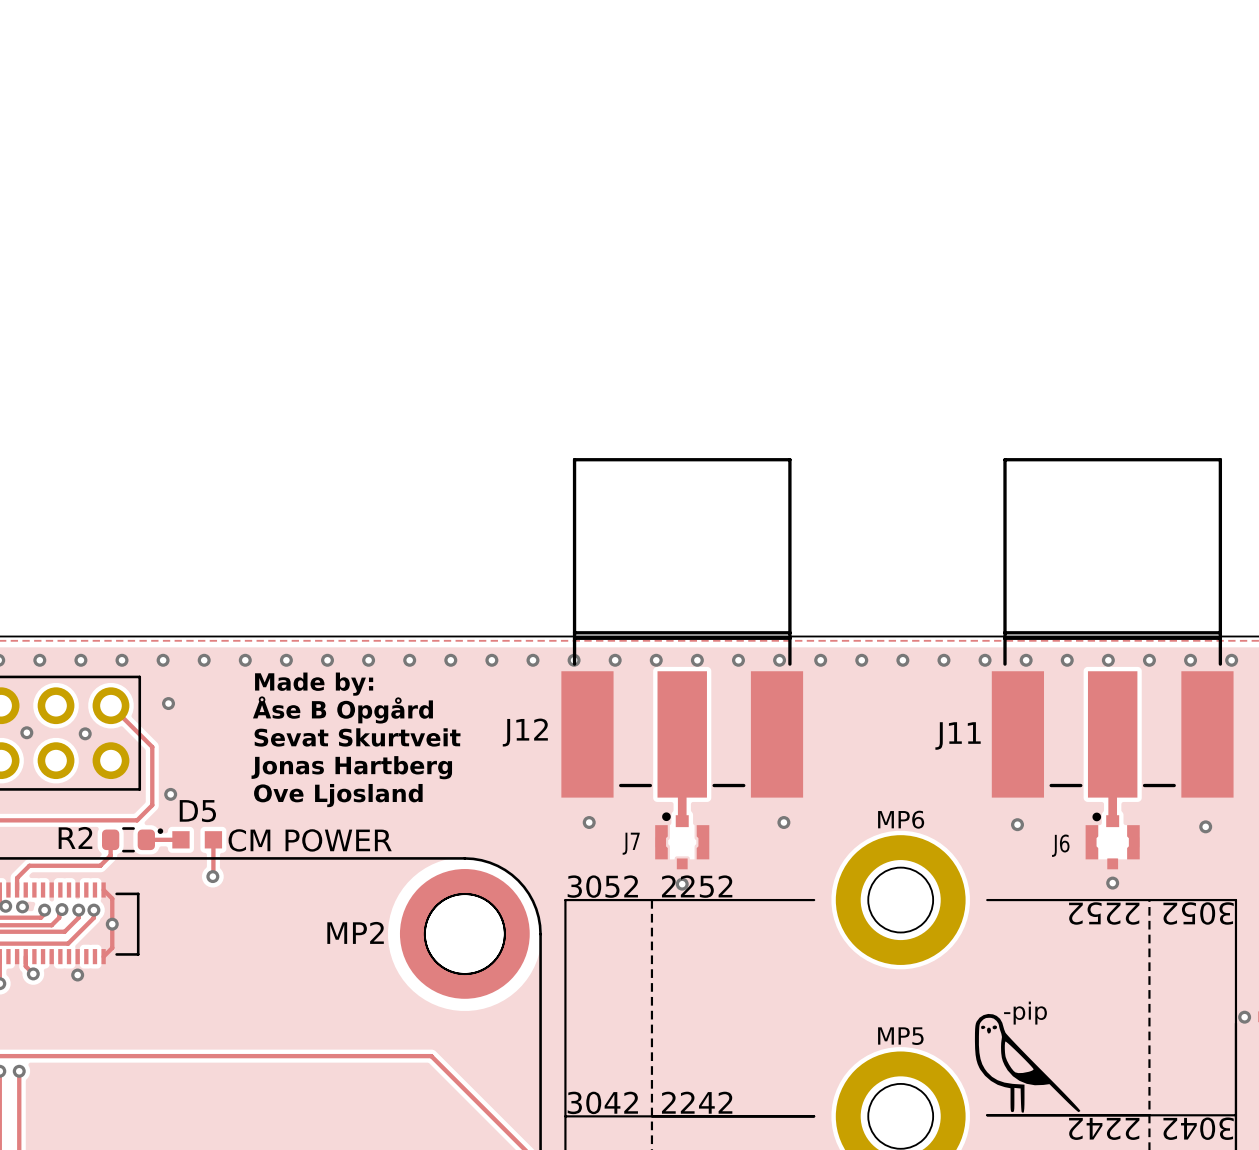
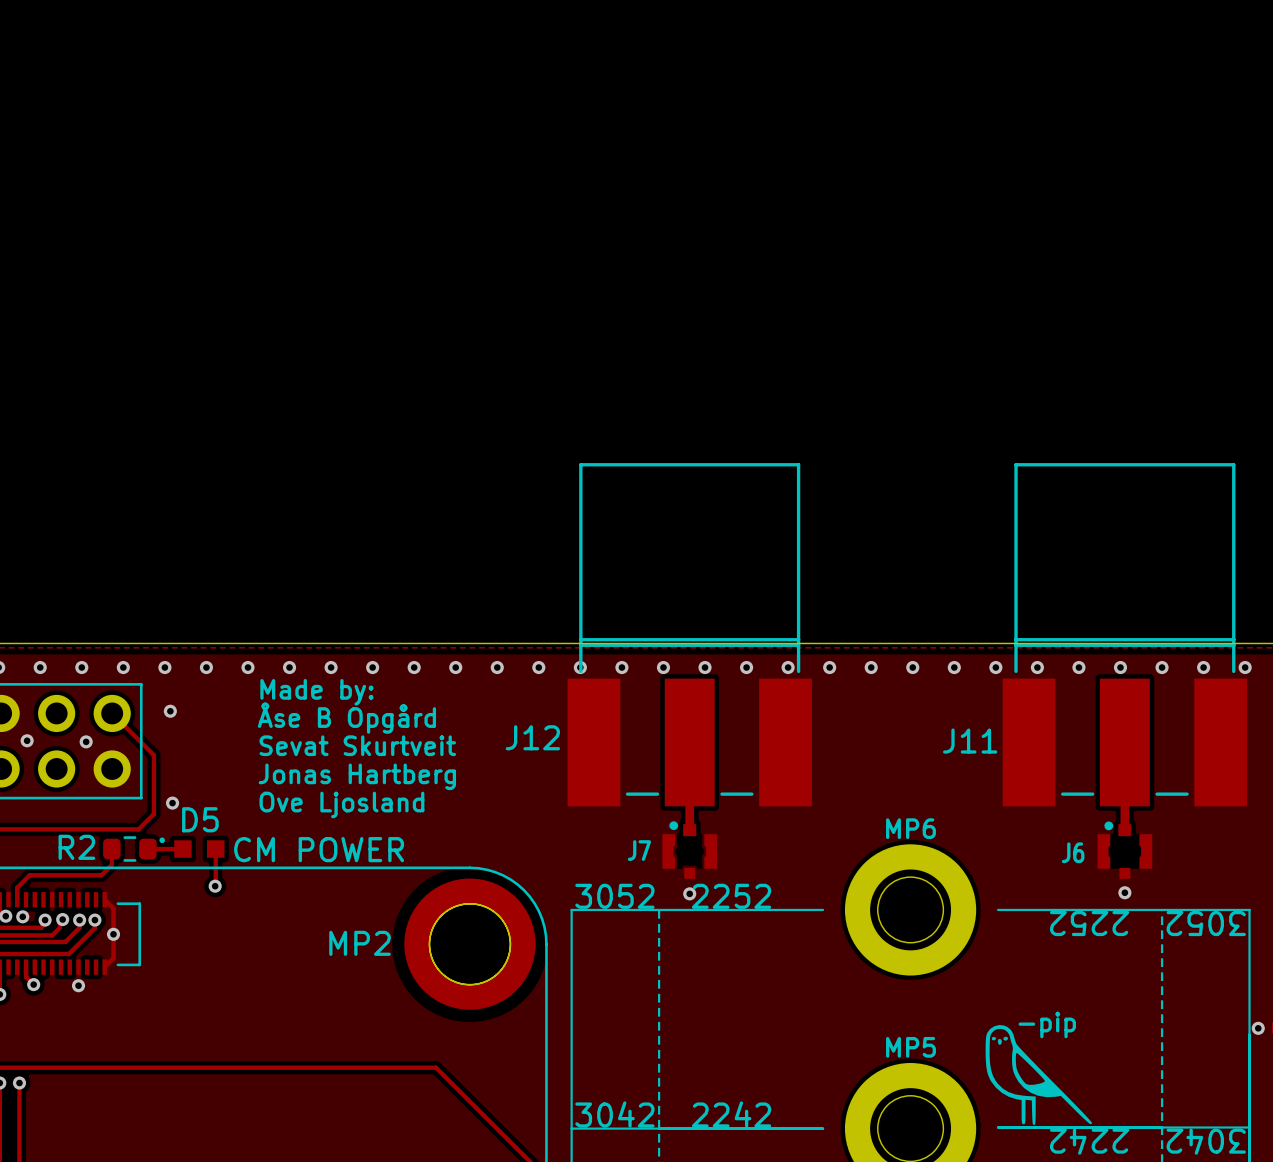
via: (589, 822) -> none
via: (783, 822) -> none
via: (1017, 824) -> none
via: (1205, 826) -> none

